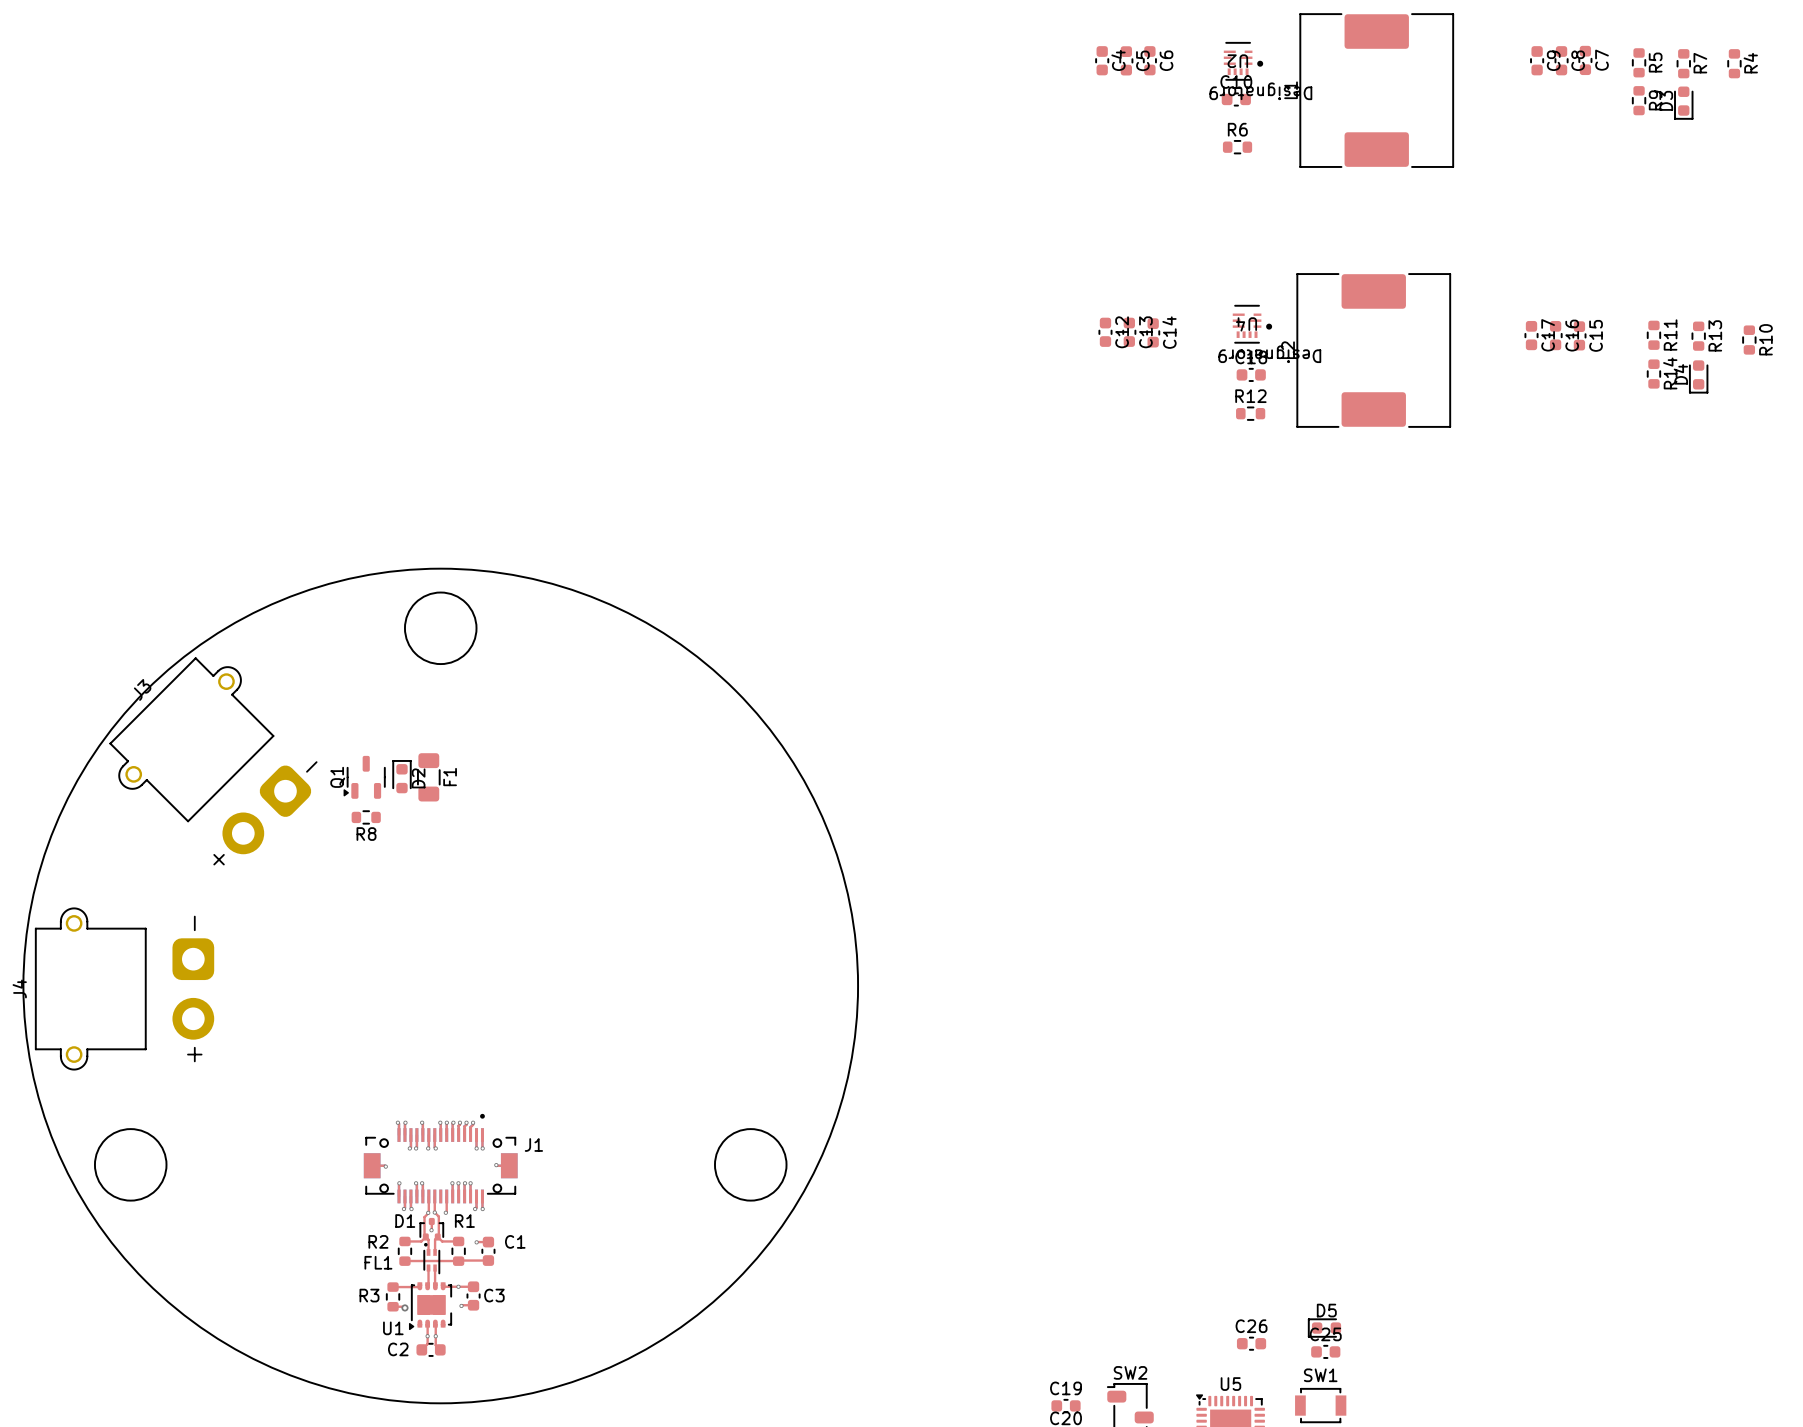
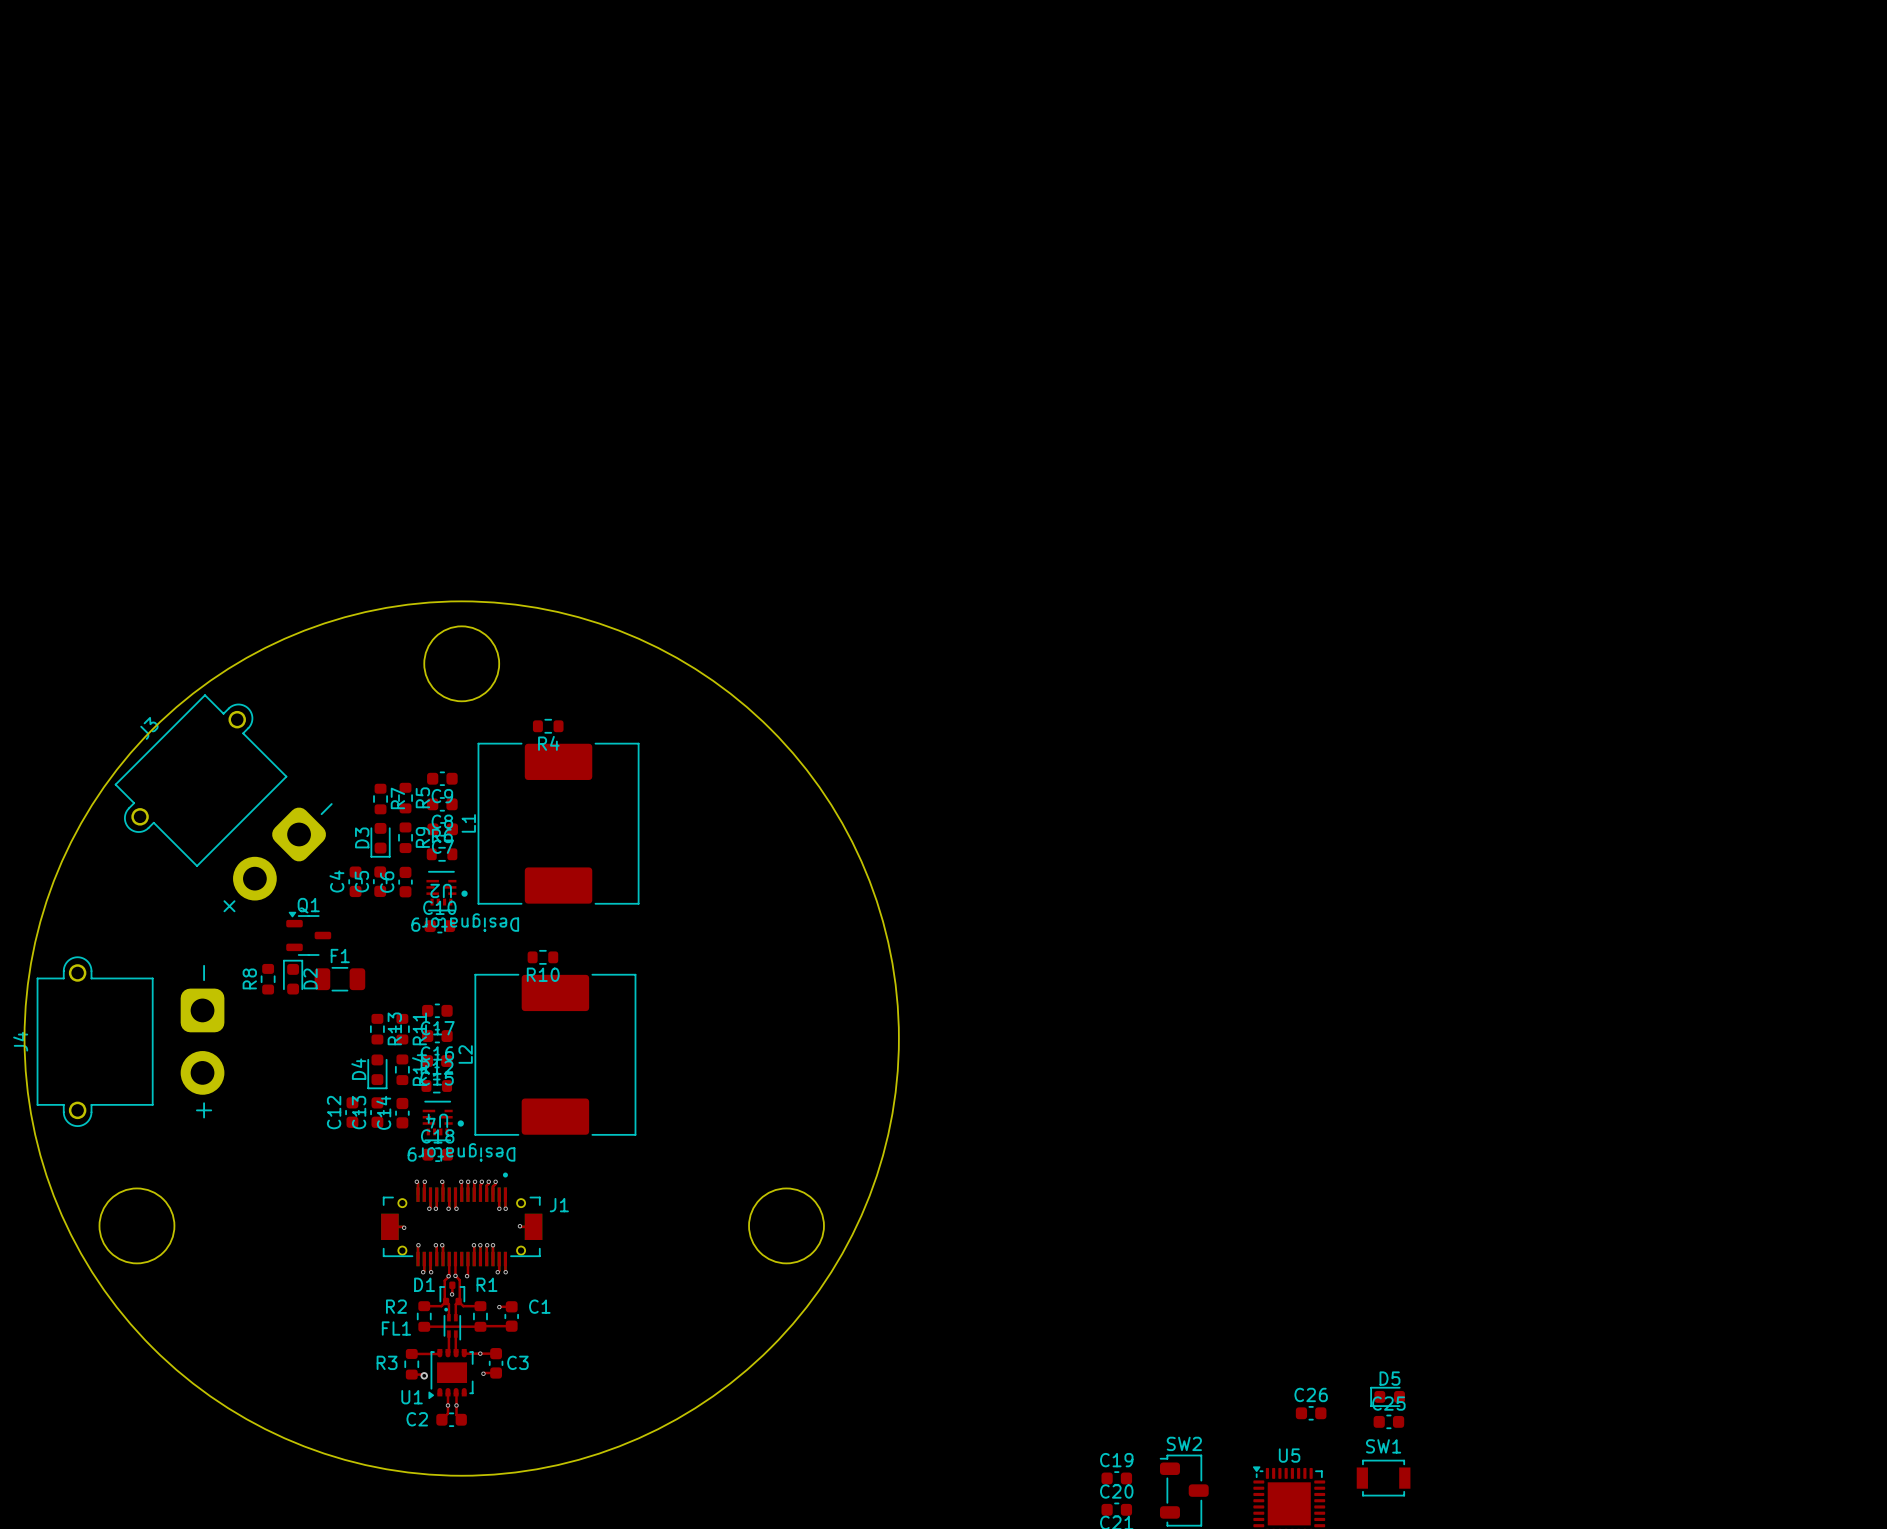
C4 position: (1102, 60) -> (355, 881)
C4 name position: C4 (1118, 60) -> C4 (336, 881)
C5 position: (1126, 60) -> (380, 881)
C5 name position: C5 (1142, 60) -> C5 (361, 881)
C6 position: (1149, 60) -> (405, 882)
C6 name position: C6 (1166, 60) -> C6 (387, 882)
C9 rotation: 0° (1537, 60) -> 90° clockwise (442, 778)
C9 position: (1537, 60) -> (442, 778)
C8 rotation: 0° (1561, 60) -> 90° clockwise (442, 804)
C8 position: (1561, 60) -> (442, 804)
C7 rotation: 0° (1585, 60) -> 90° clockwise (442, 829)
C7 position: (1585, 60) -> (442, 829)
U2 position: (1243, 61) -> (447, 891)
R5 position: (1639, 62) -> (405, 798)
R7 position: (1683, 63) -> (380, 799)
R4 rotation: 0° (1734, 63) -> 90° clockwise (548, 726)
R4 position: (1734, 63) -> (548, 726)
L1 position: (1376, 90) -> (558, 823)
C10 position: (1236, 99) -> (439, 926)
R9 position: (1639, 100) -> (405, 837)
D3 position: (1683, 103) -> (380, 840)
R6 position: (1237, 147) -> (442, 854)
U4 position: (1252, 324) -> (443, 1120)
C12 position: (1105, 332) -> (352, 1112)
C12 name position: C12 (1122, 332) -> C12 (334, 1112)
C13 position: (1129, 332) -> (377, 1112)
C13 name position: C13 (1145, 332) -> C13 (359, 1112)
C14 position: (1153, 332) -> (402, 1113)
C14 name position: C14 (1169, 332) -> C14 (383, 1112)
C17 rotation: 0° (1531, 335) -> 90° clockwise (437, 1010)
C17 position: (1531, 335) -> (437, 1010)
C16 rotation: 0° (1555, 335) -> 90° clockwise (437, 1036)
C16 position: (1555, 335) -> (437, 1036)
C15 rotation: 0° (1579, 335) -> 90° clockwise (437, 1061)
C15 position: (1579, 335) -> (437, 1061)
R11 position: (1653, 335) -> (402, 1029)
R13 position: (1698, 336) -> (377, 1029)
R10 rotation: 0° (1749, 340) -> 90° clockwise (542, 957)
R10 position: (1749, 340) -> (542, 957)
L2 position: (1373, 350) -> (555, 1054)
C18 position: (1251, 374) -> (437, 1154)
R14 position: (1653, 374) -> (402, 1069)
D4 position: (1698, 376) -> (377, 1071)
R12 position: (1250, 413) -> (436, 1086)
D2 position: (401, 776) -> (293, 977)
Q1 rotation: 0° (364, 777) -> 90° clockwise (308, 933)
Q1 position: (364, 777) -> (308, 933)
F1 rotation: 0° (428, 777) -> 90° clockwise (339, 979)
F1 position: (428, 777) -> (339, 979)
F1 name position: F1 (450, 777) -> F1 (340, 956)
R8 rotation: 0° (366, 817) -> 90° clockwise (268, 979)
R8 position: (366, 817) -> (268, 979)

